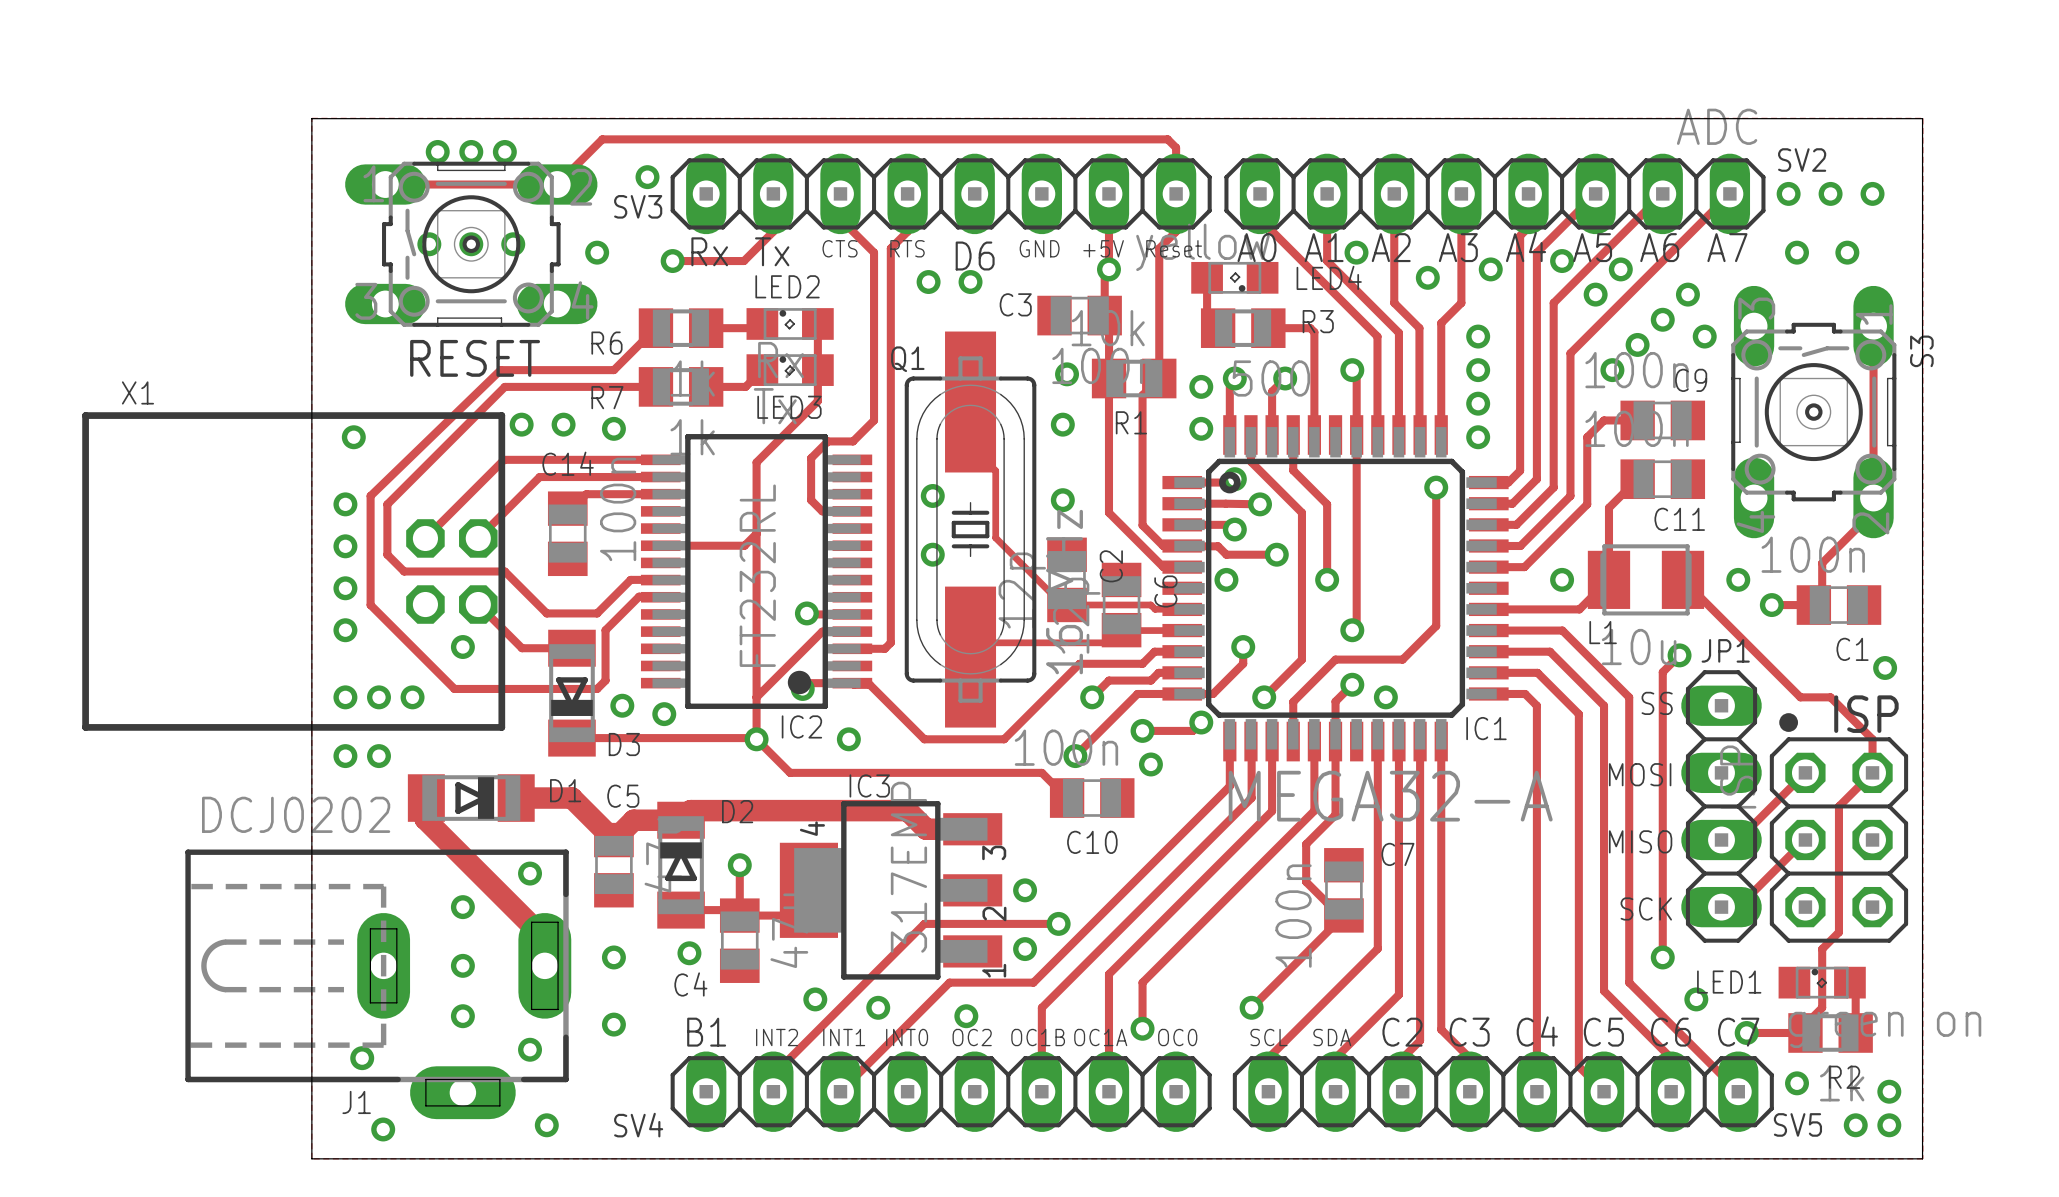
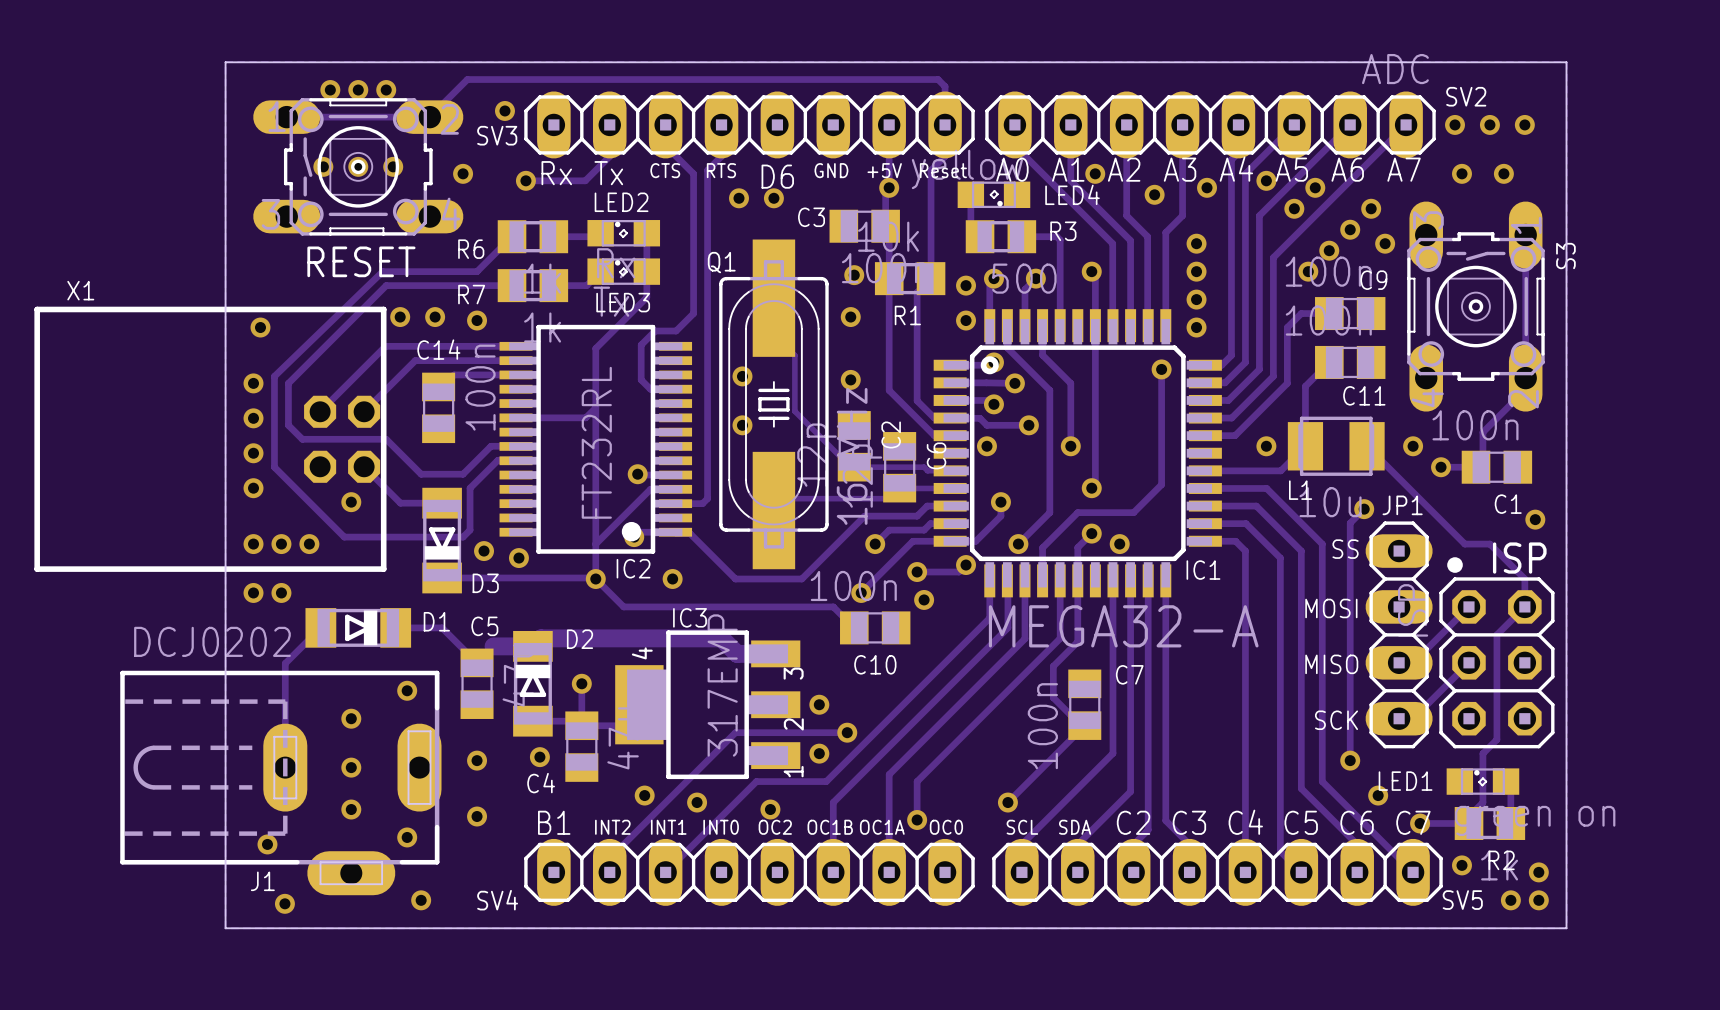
track width: thick (516, 798) (571, 798) (613, 840) (633, 820) -> thin (395, 627) (442, 627) (477, 662) (493, 646)
track: (425, 799) (425, 819) (544, 938) (544, 965) -> (319, 628) (285, 663) (285, 767)

